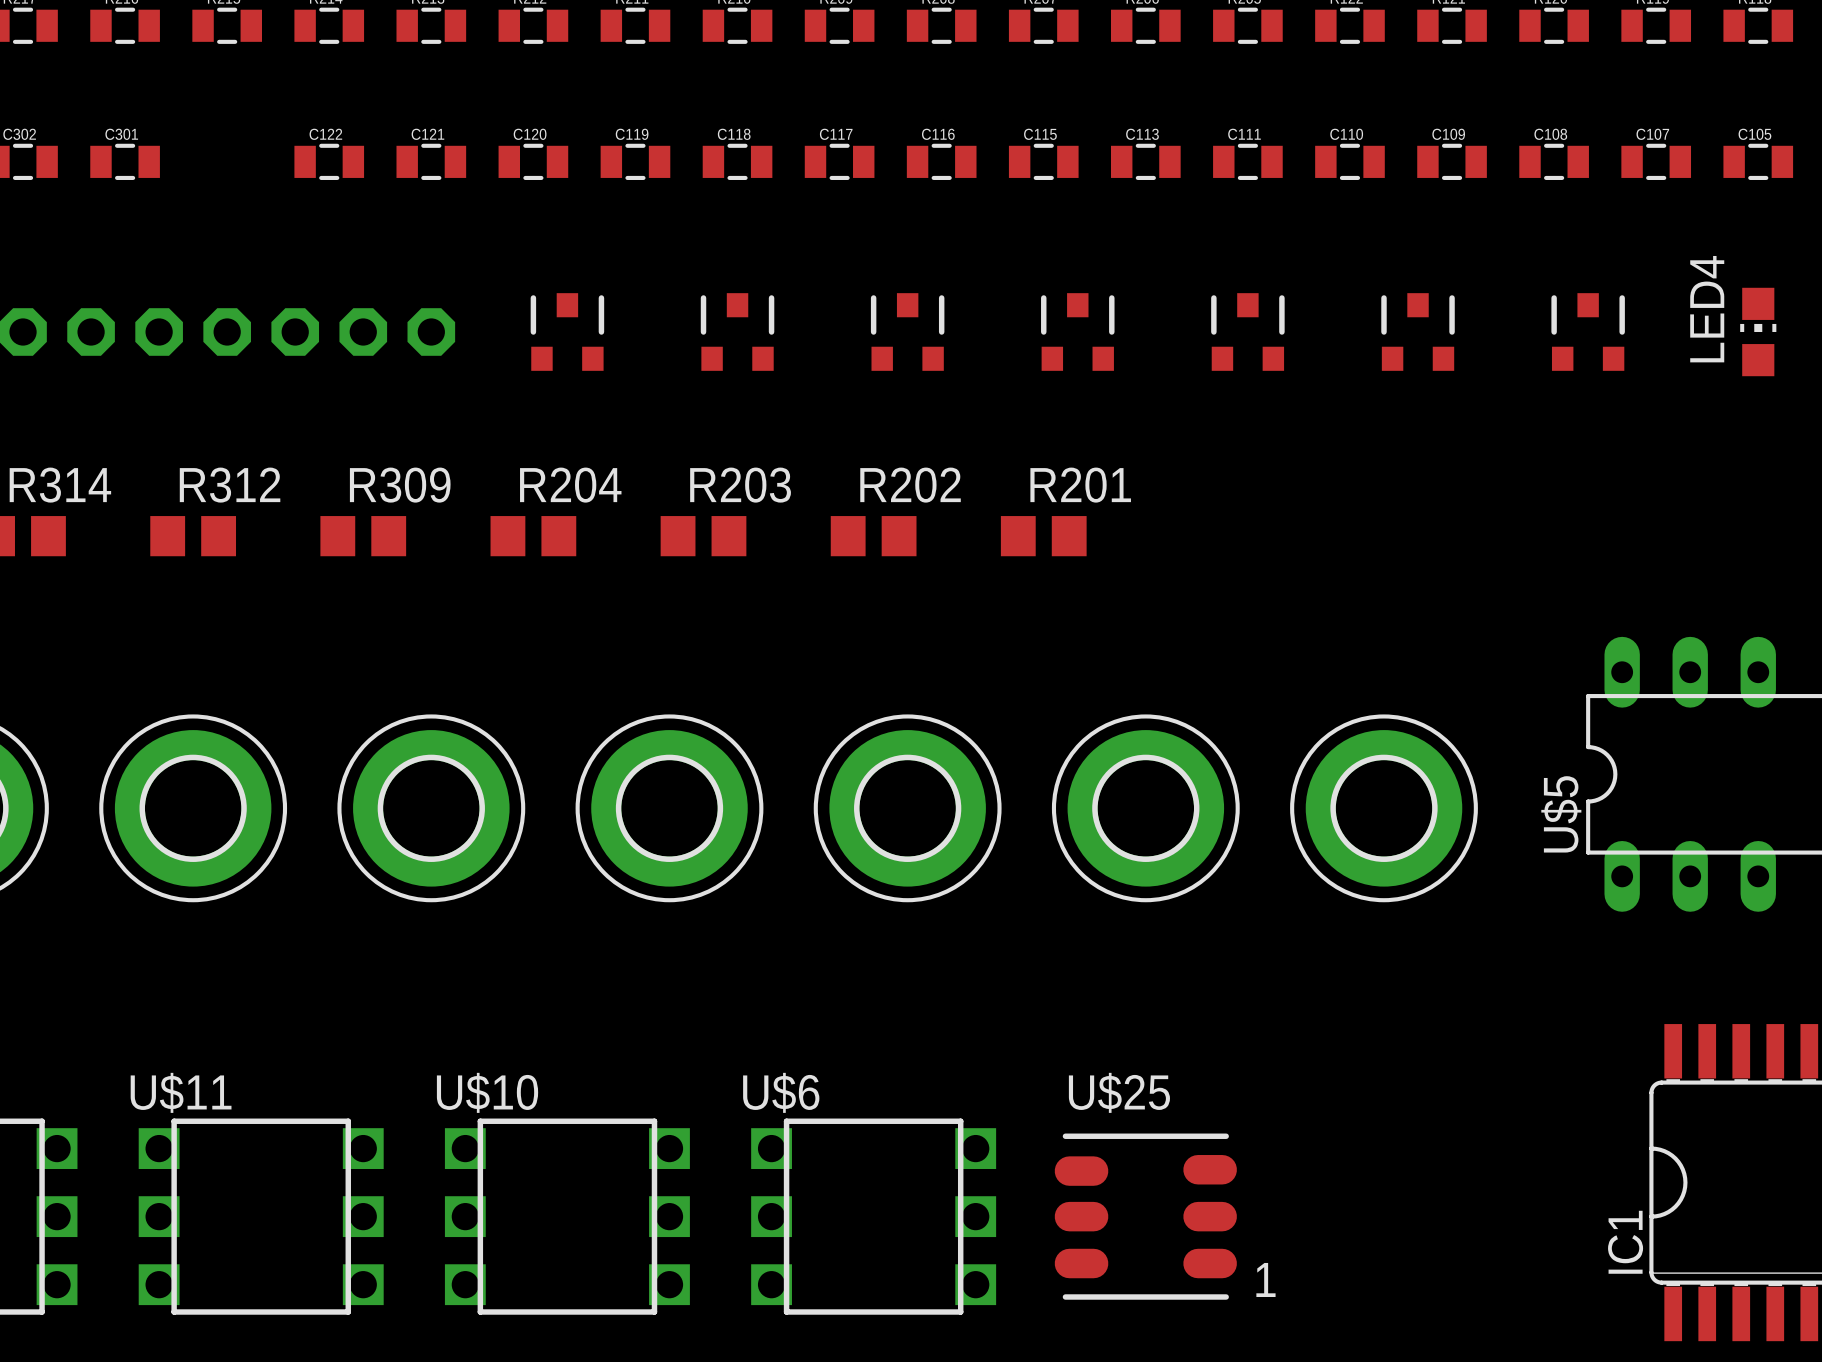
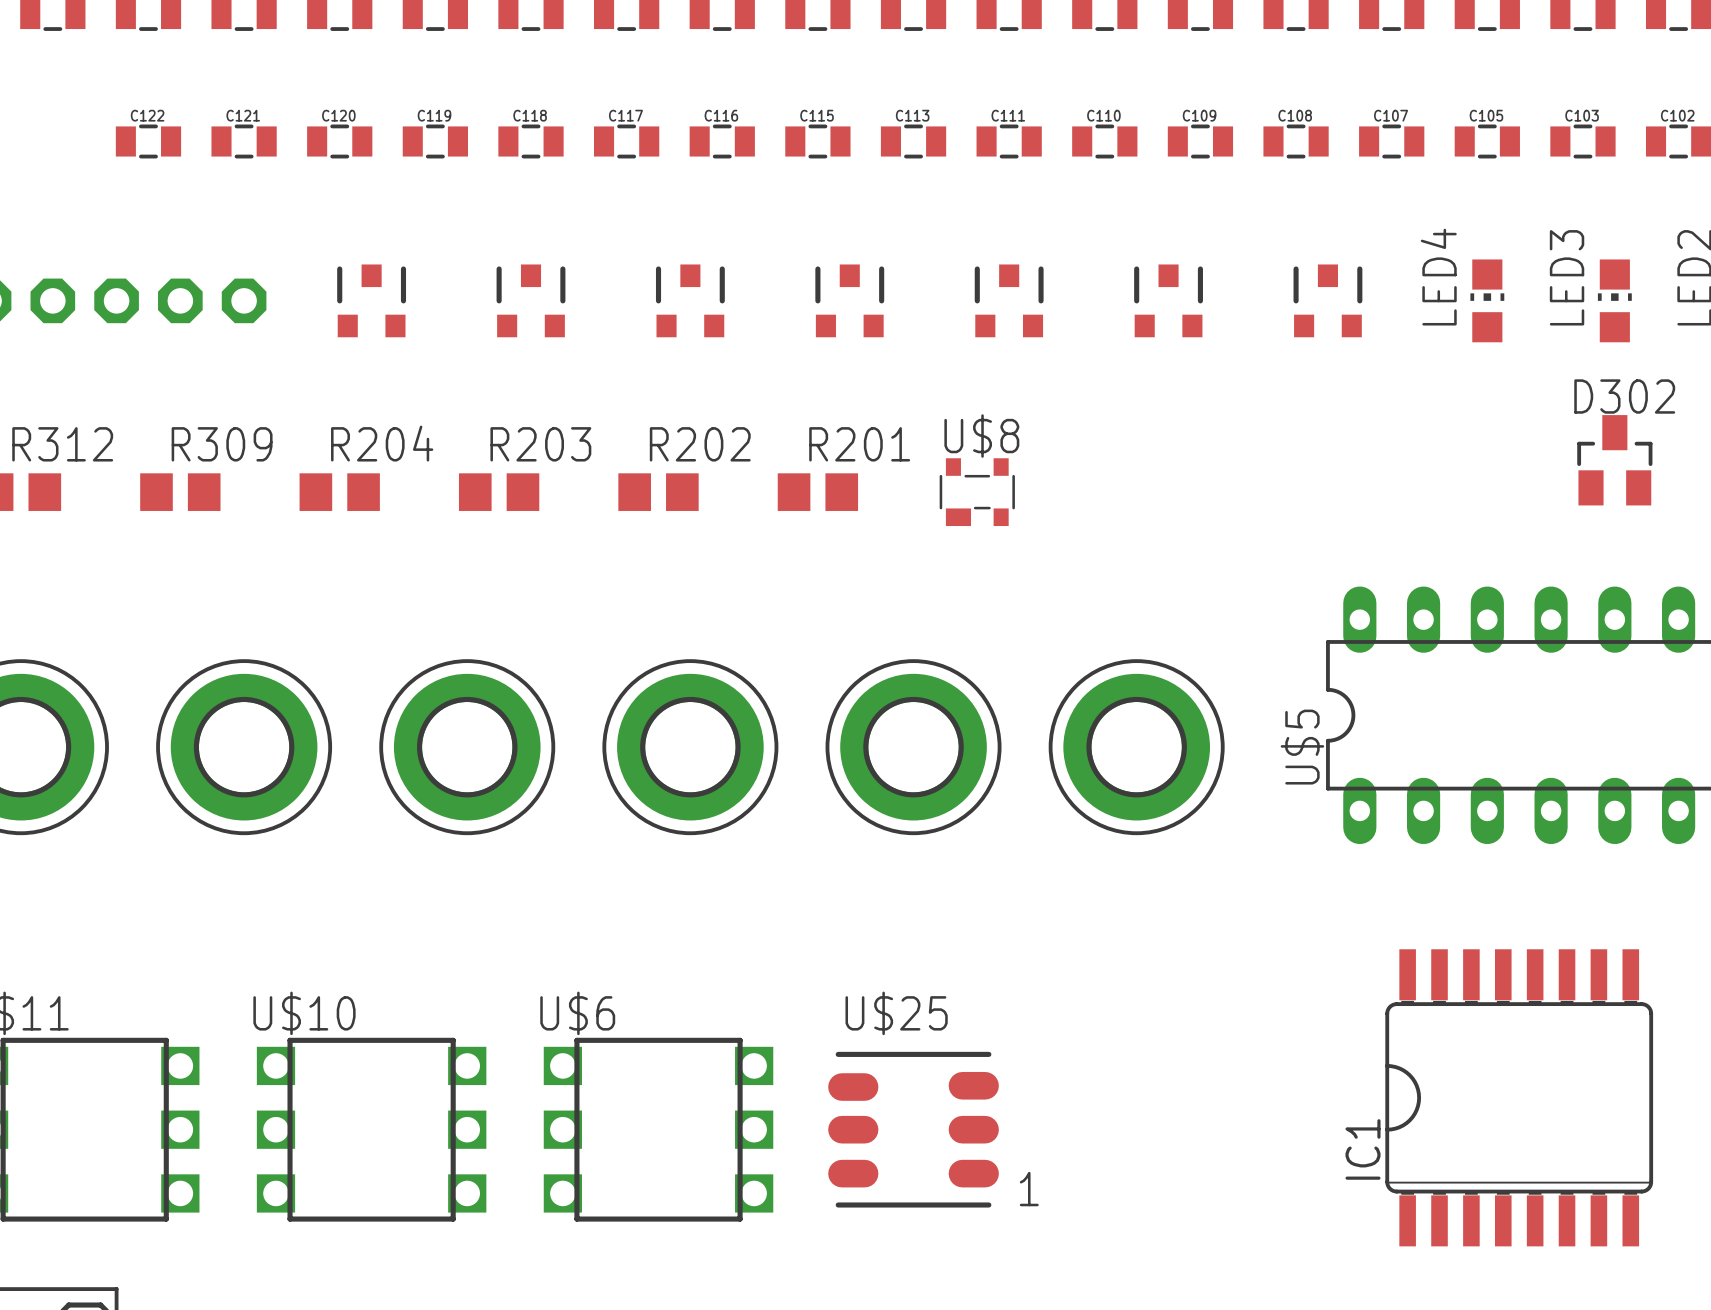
U$8: none -> (977, 492)

